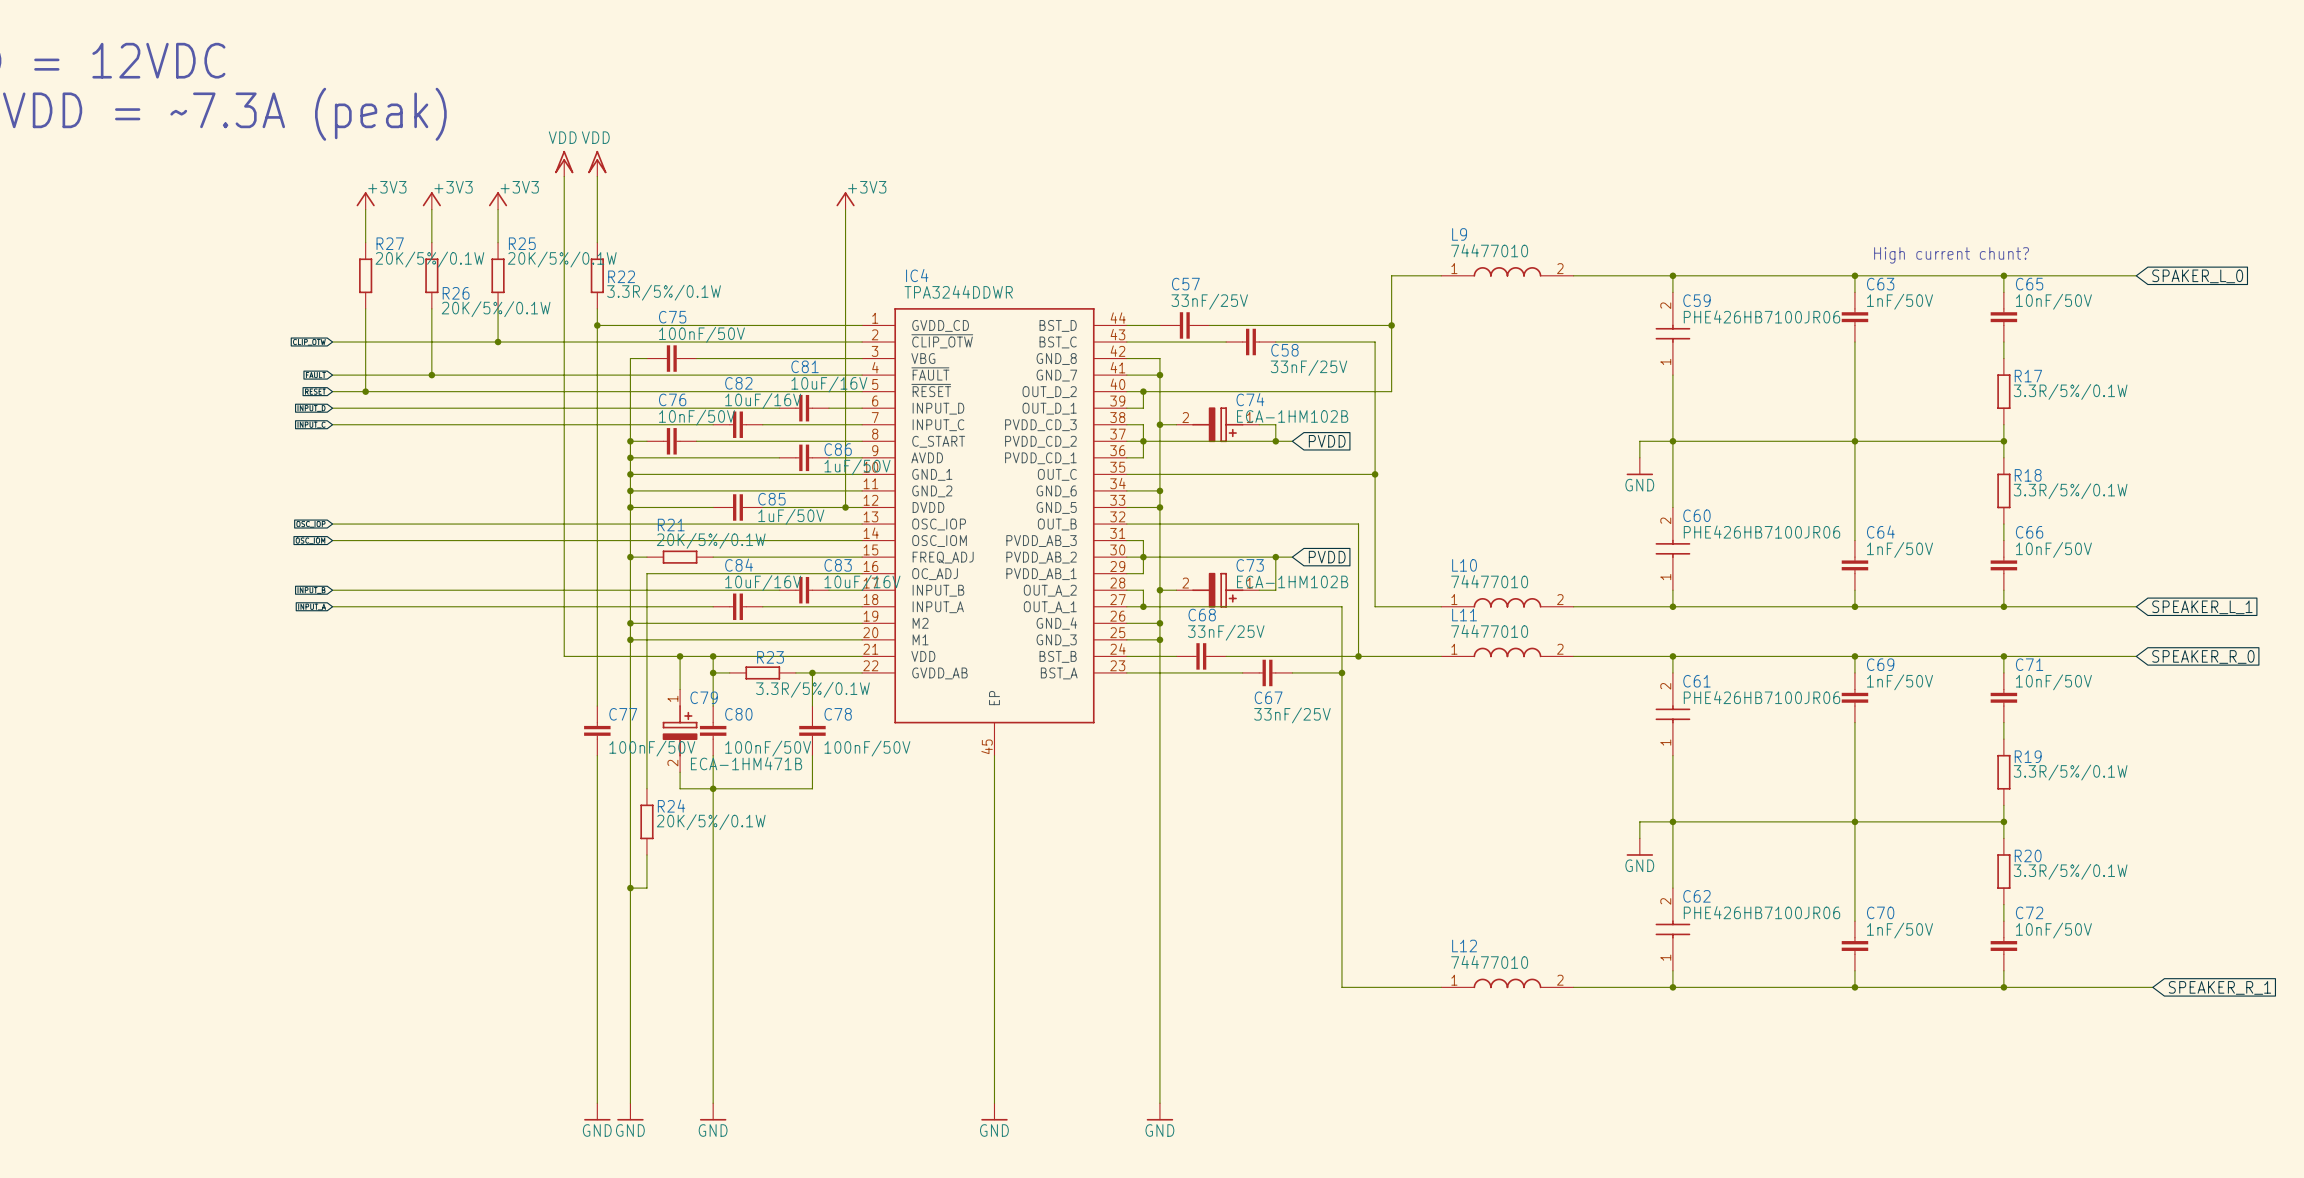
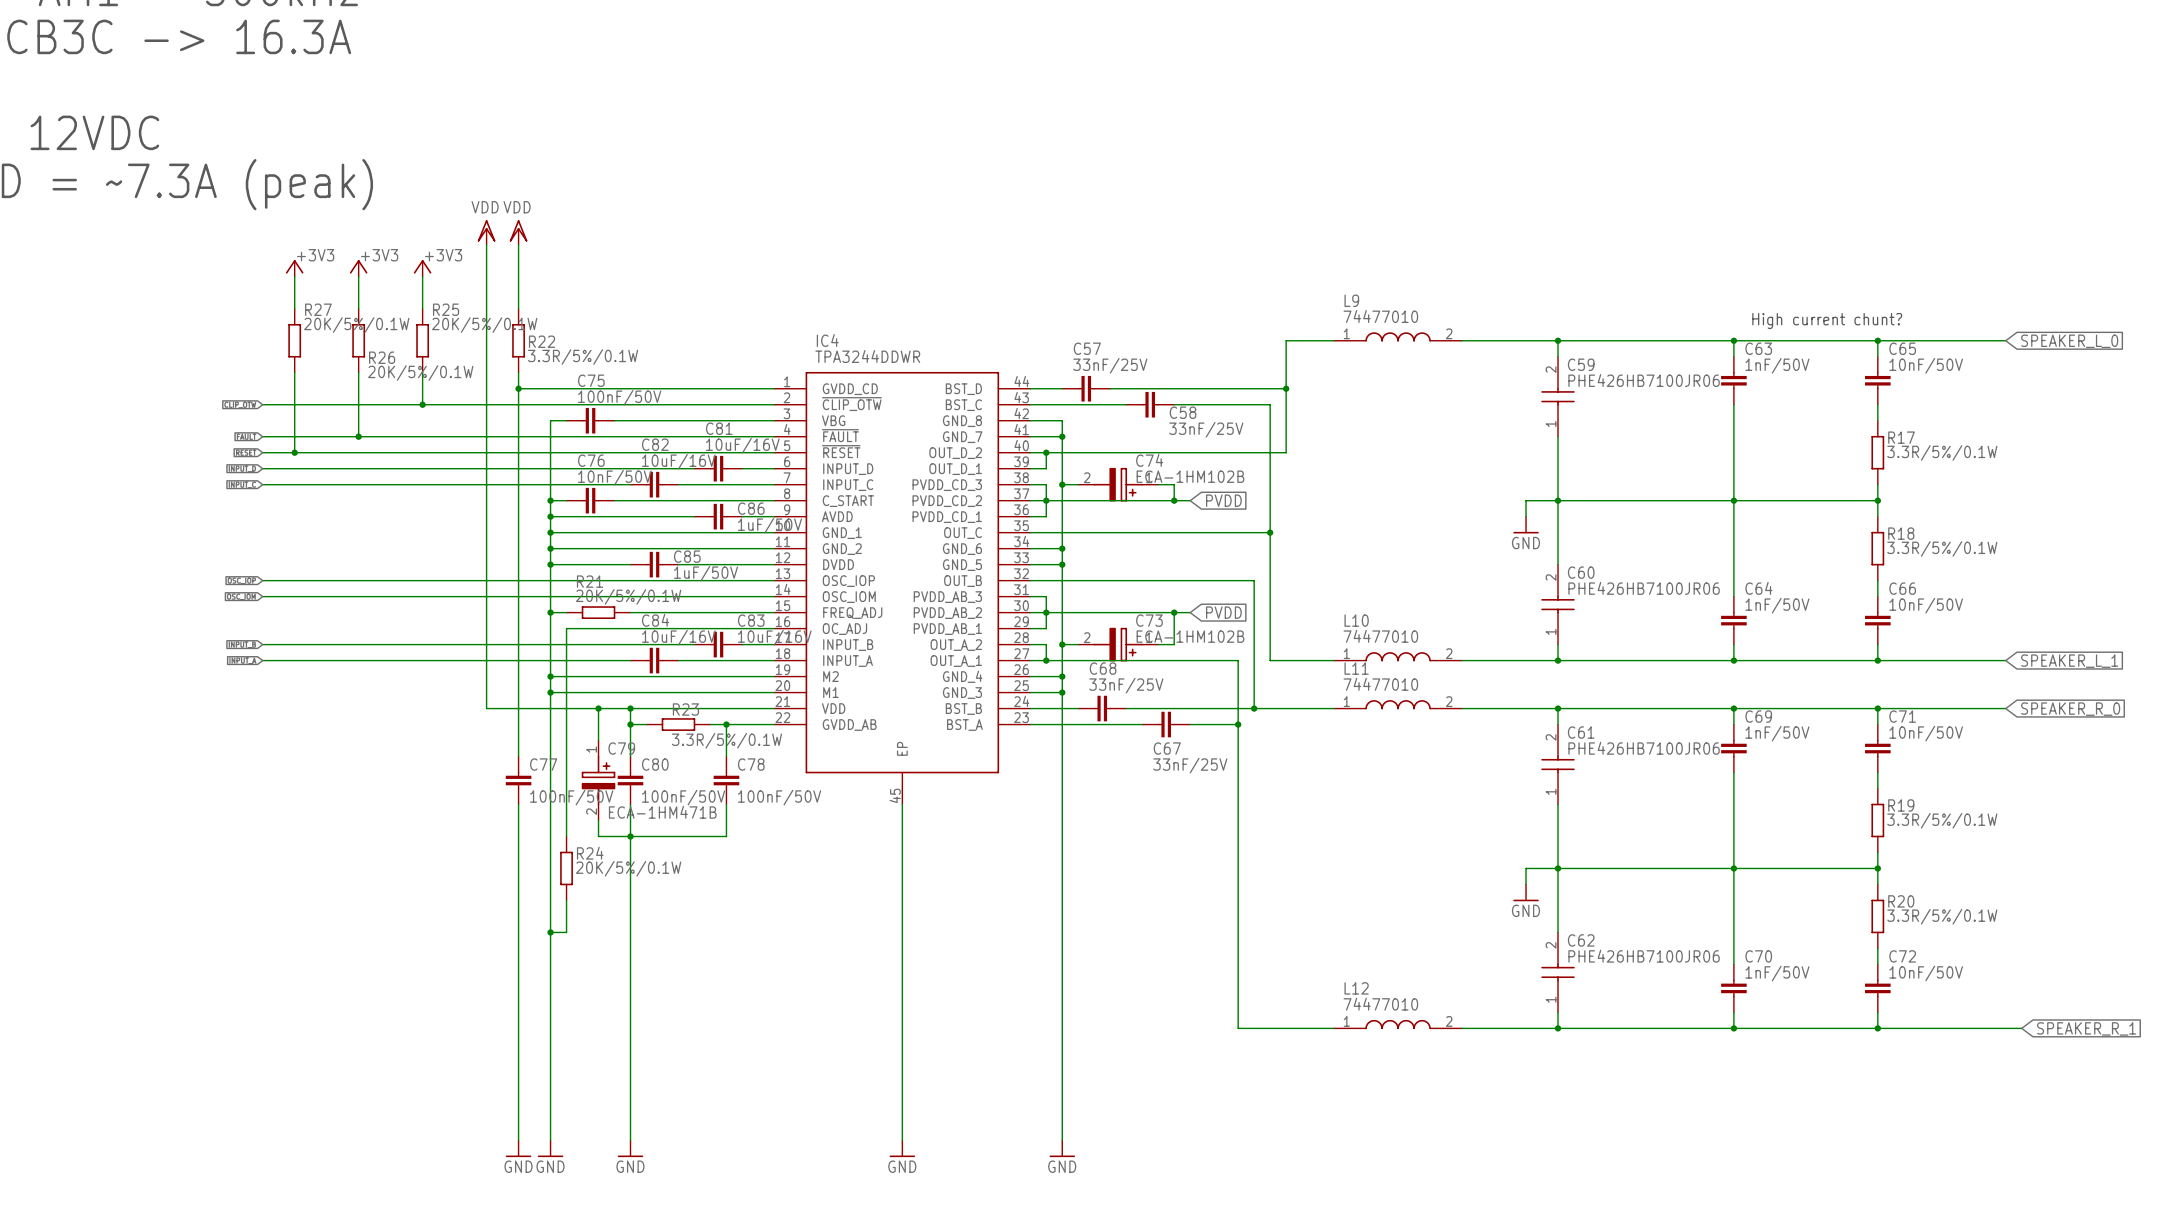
power symbol: +3V3 (845, 200) -> none
wire: (845, 209) (845, 507) -> none
global label: SPAKER_L_0 (2197, 276) -> SPEAKER_L_0 (2069, 341)
junction: (845, 507) -> none

